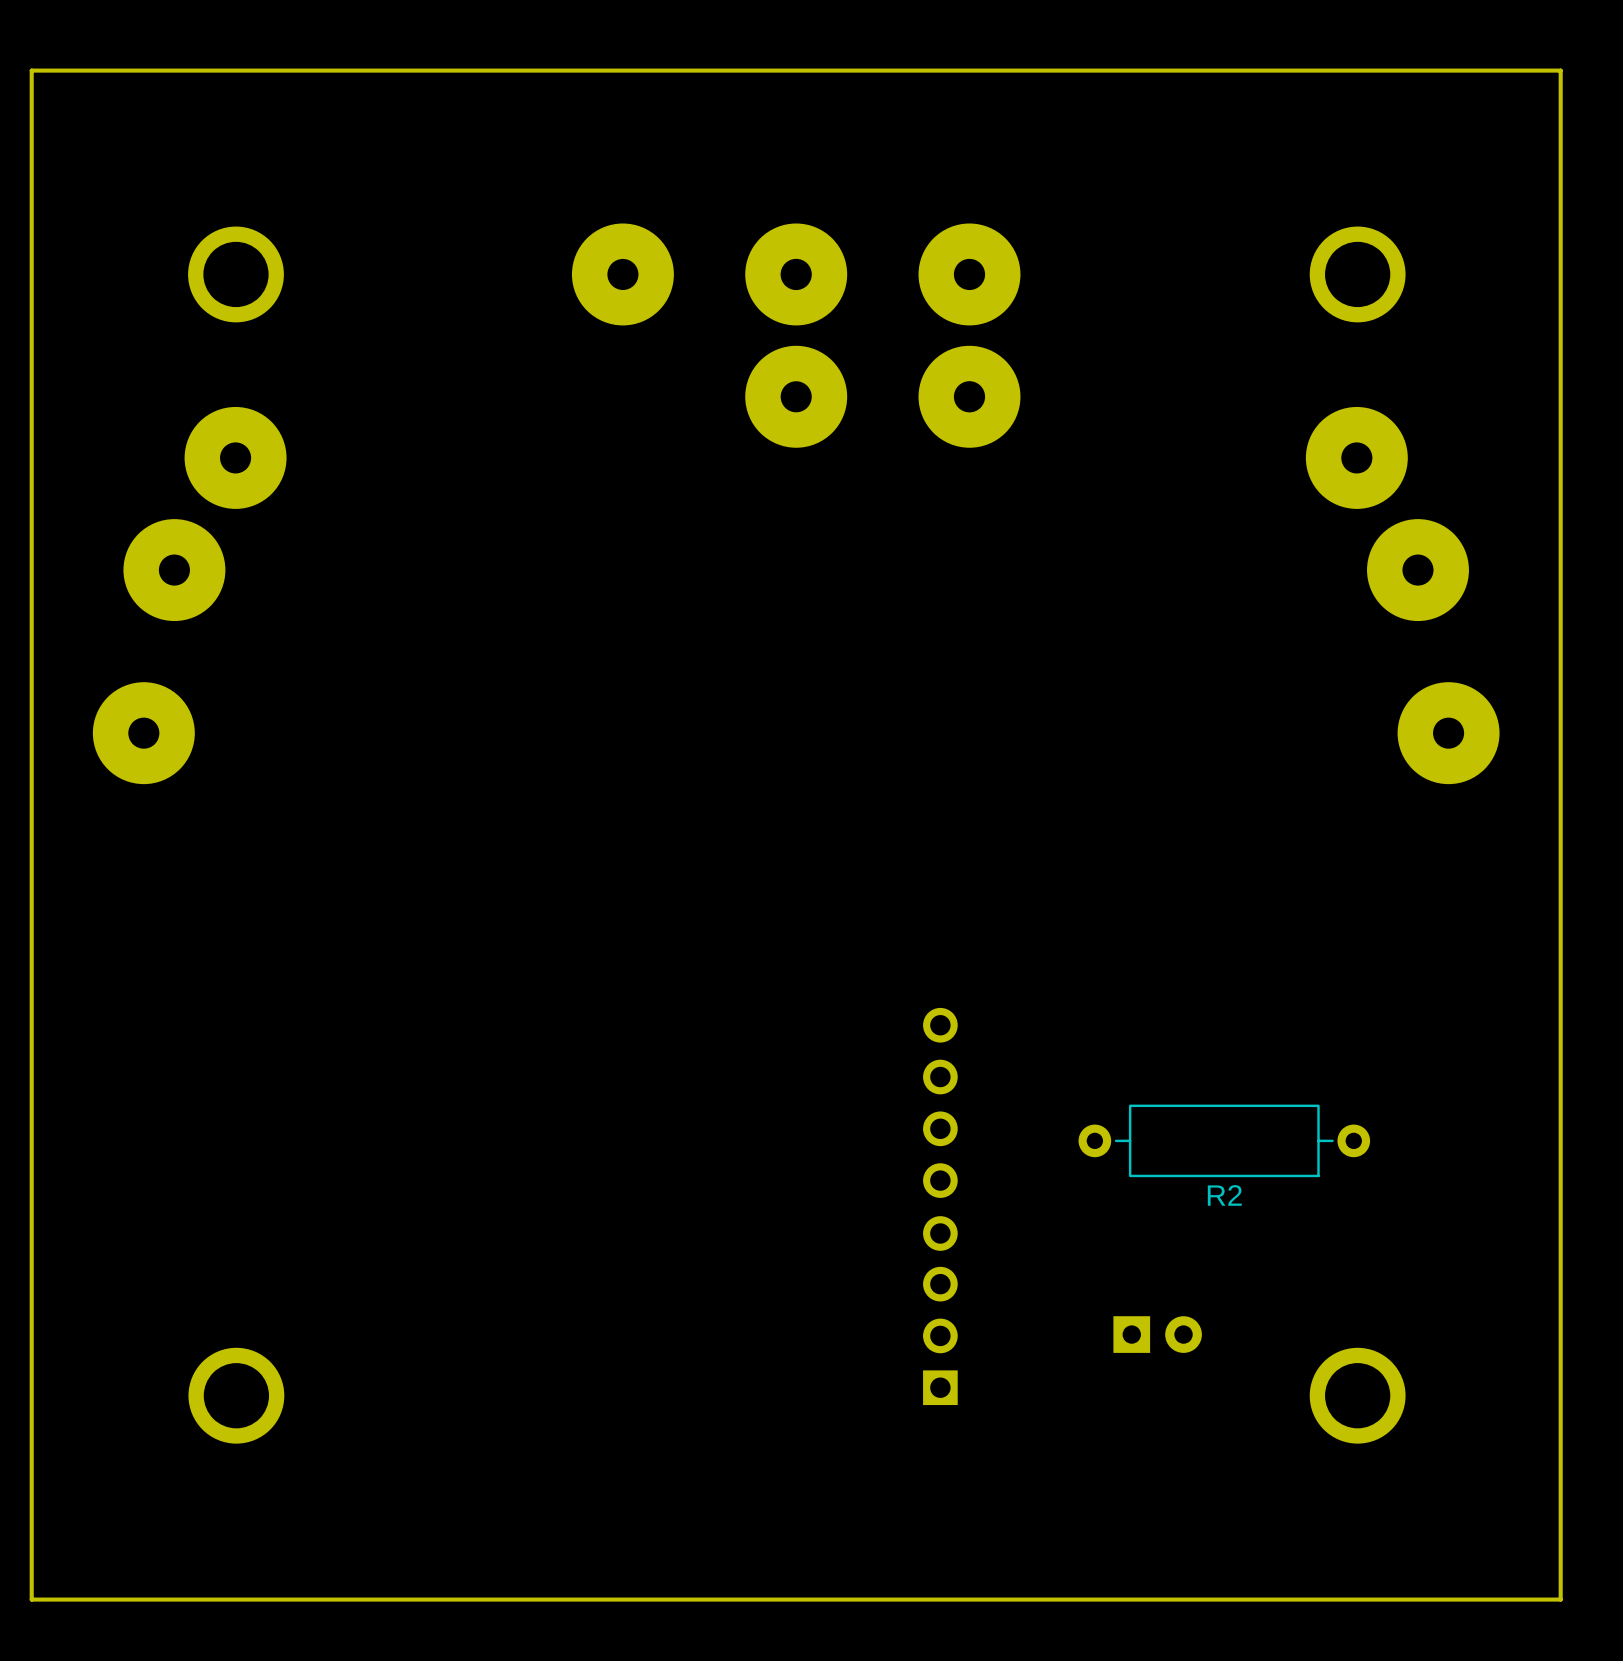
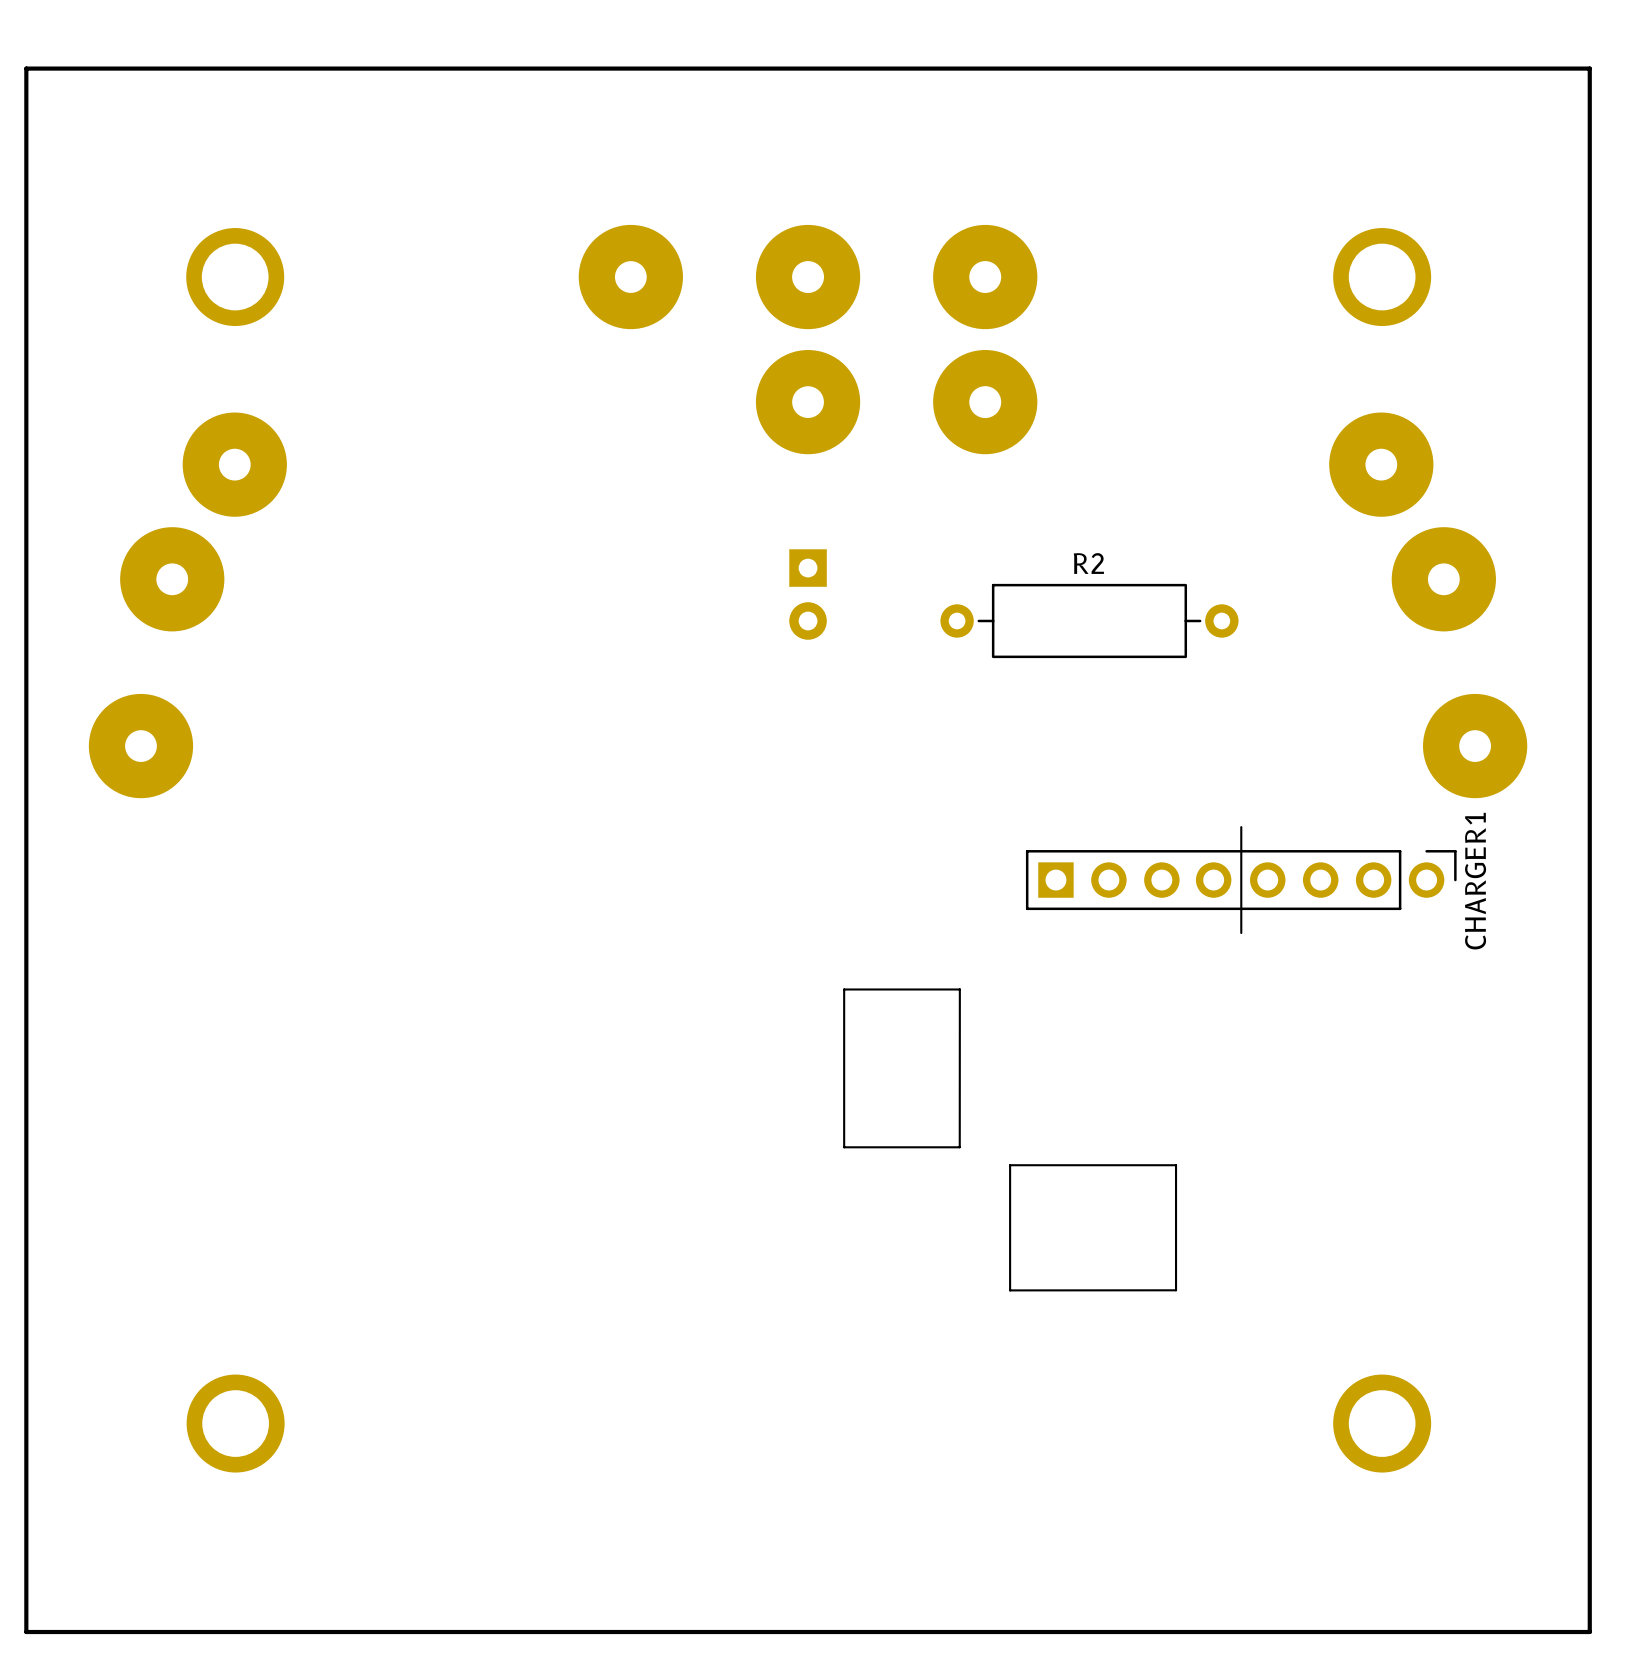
part: none -> (808, 594)
R2 position: (1224, 1140) -> (1089, 620)
R2 name position: R2 (1224, 1195) -> R2 (1088, 563)
CHARGER1 side: bottom (940, 1206) -> top (1149, 1058)
part: (1157, 1334) -> none

